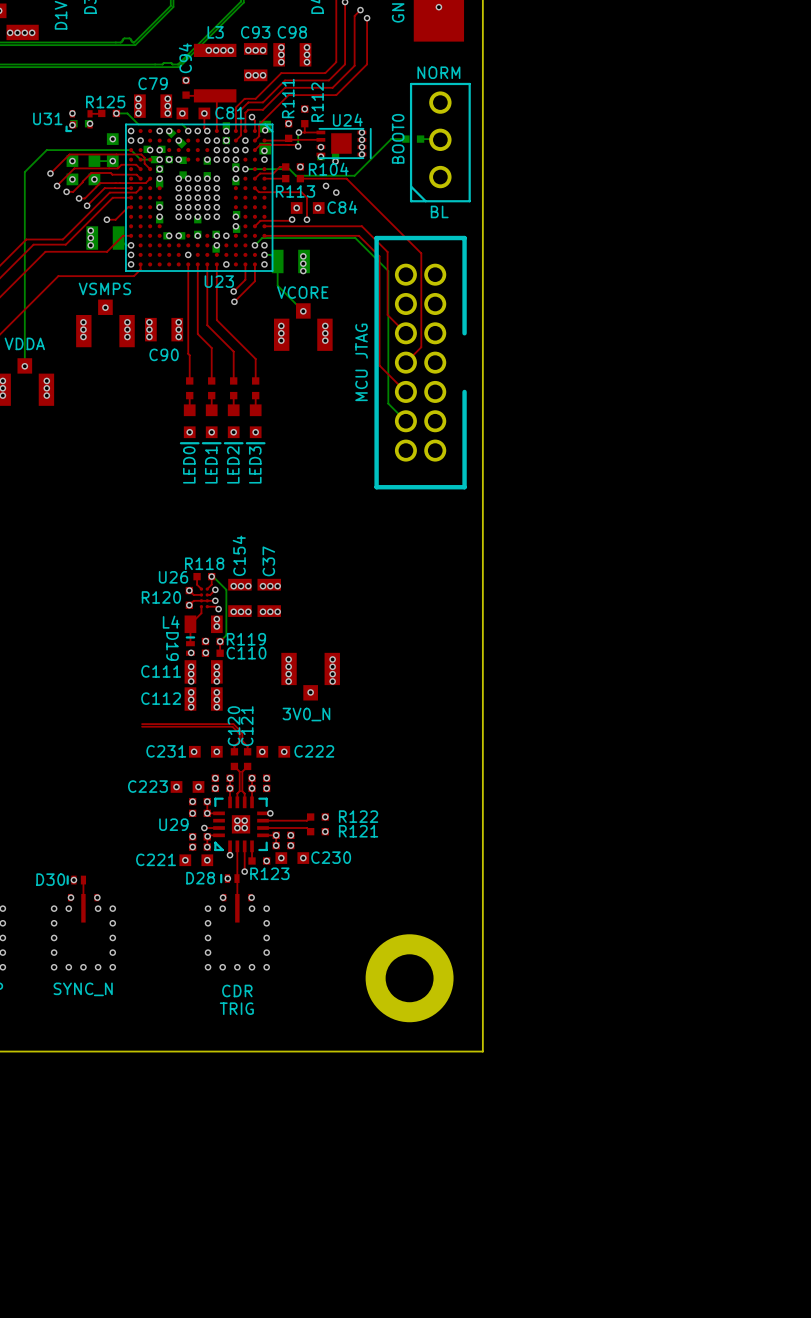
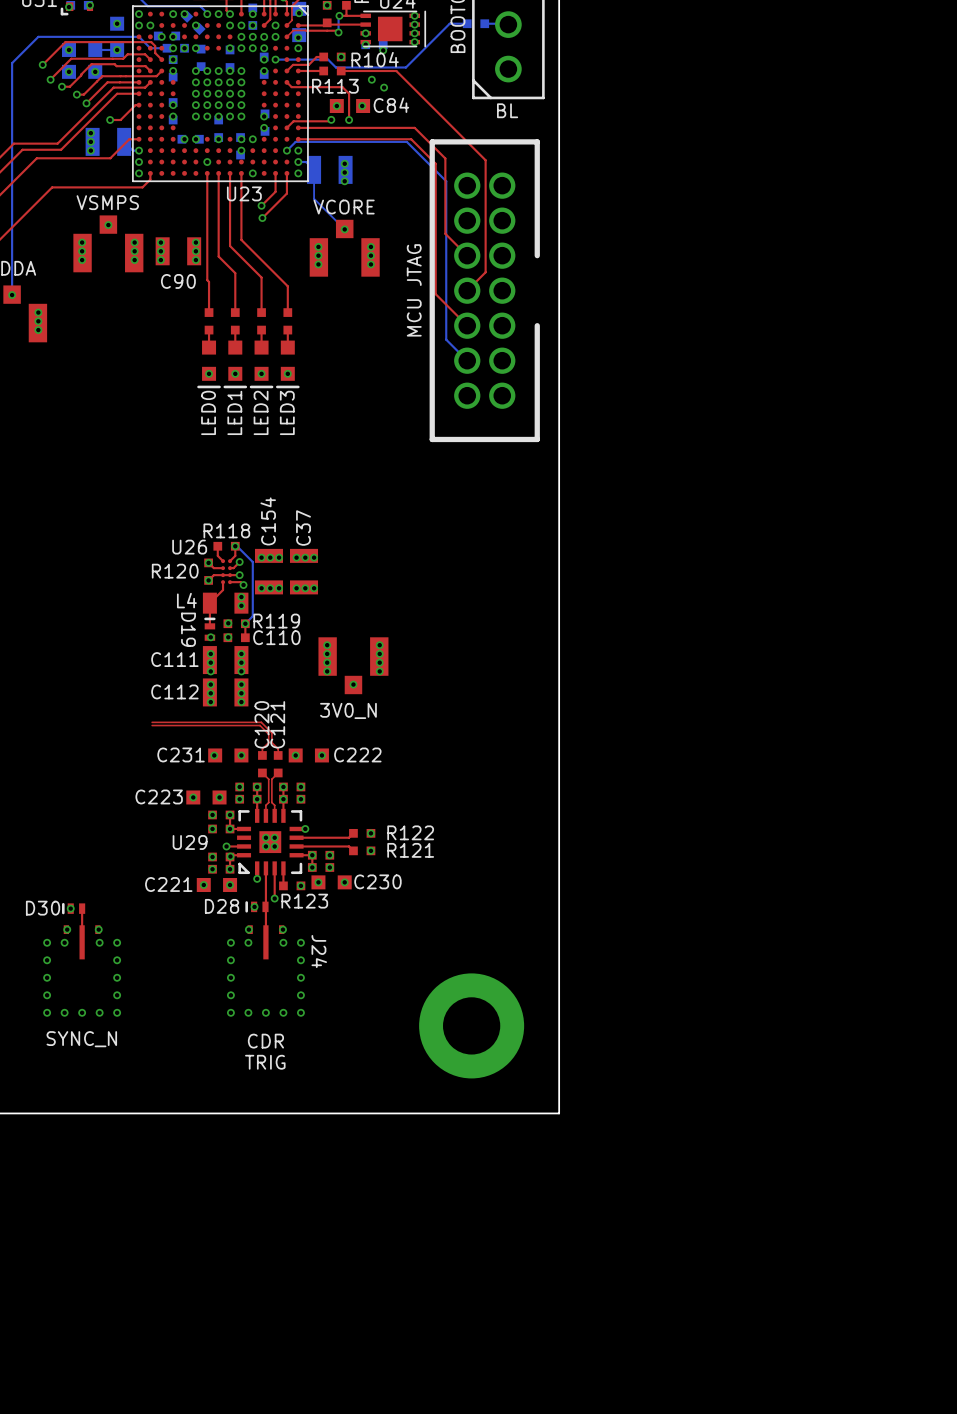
J24 name: none -> J24 (319, 951)

